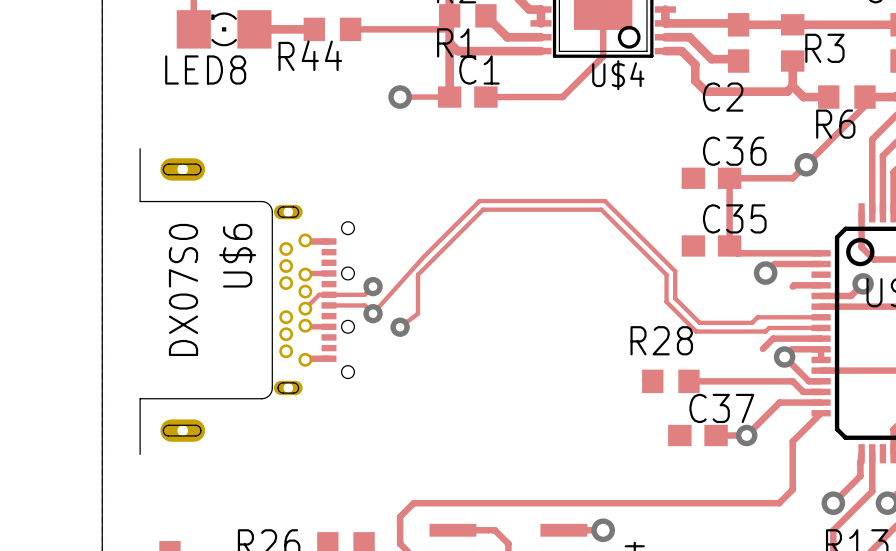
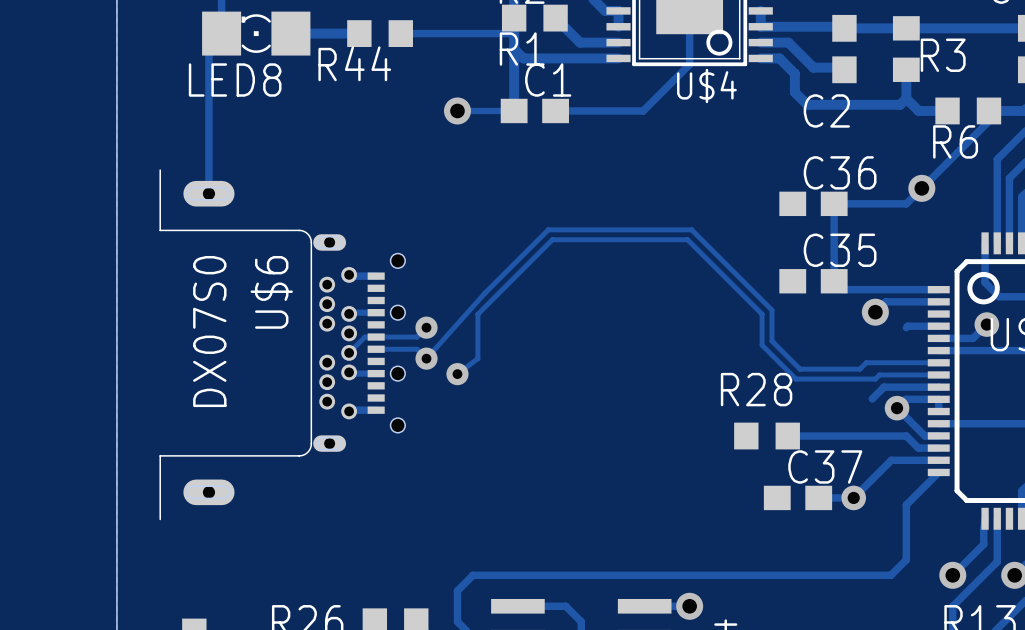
track: none -> (221, 33) (208, 46) (208, 193)

